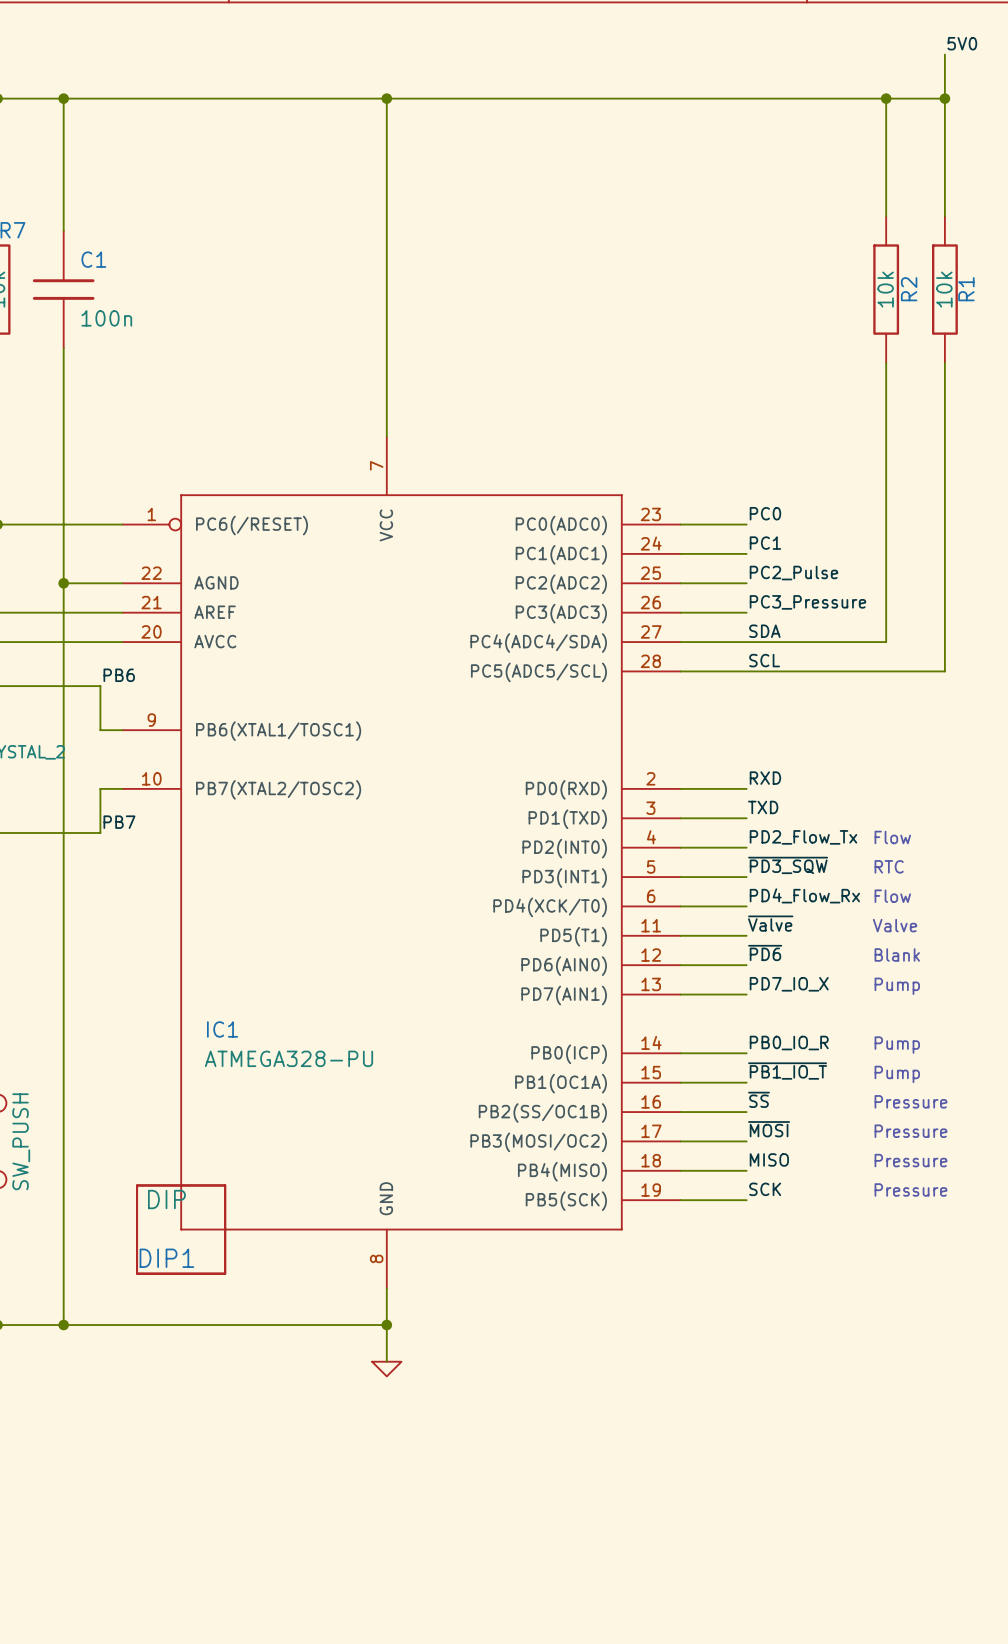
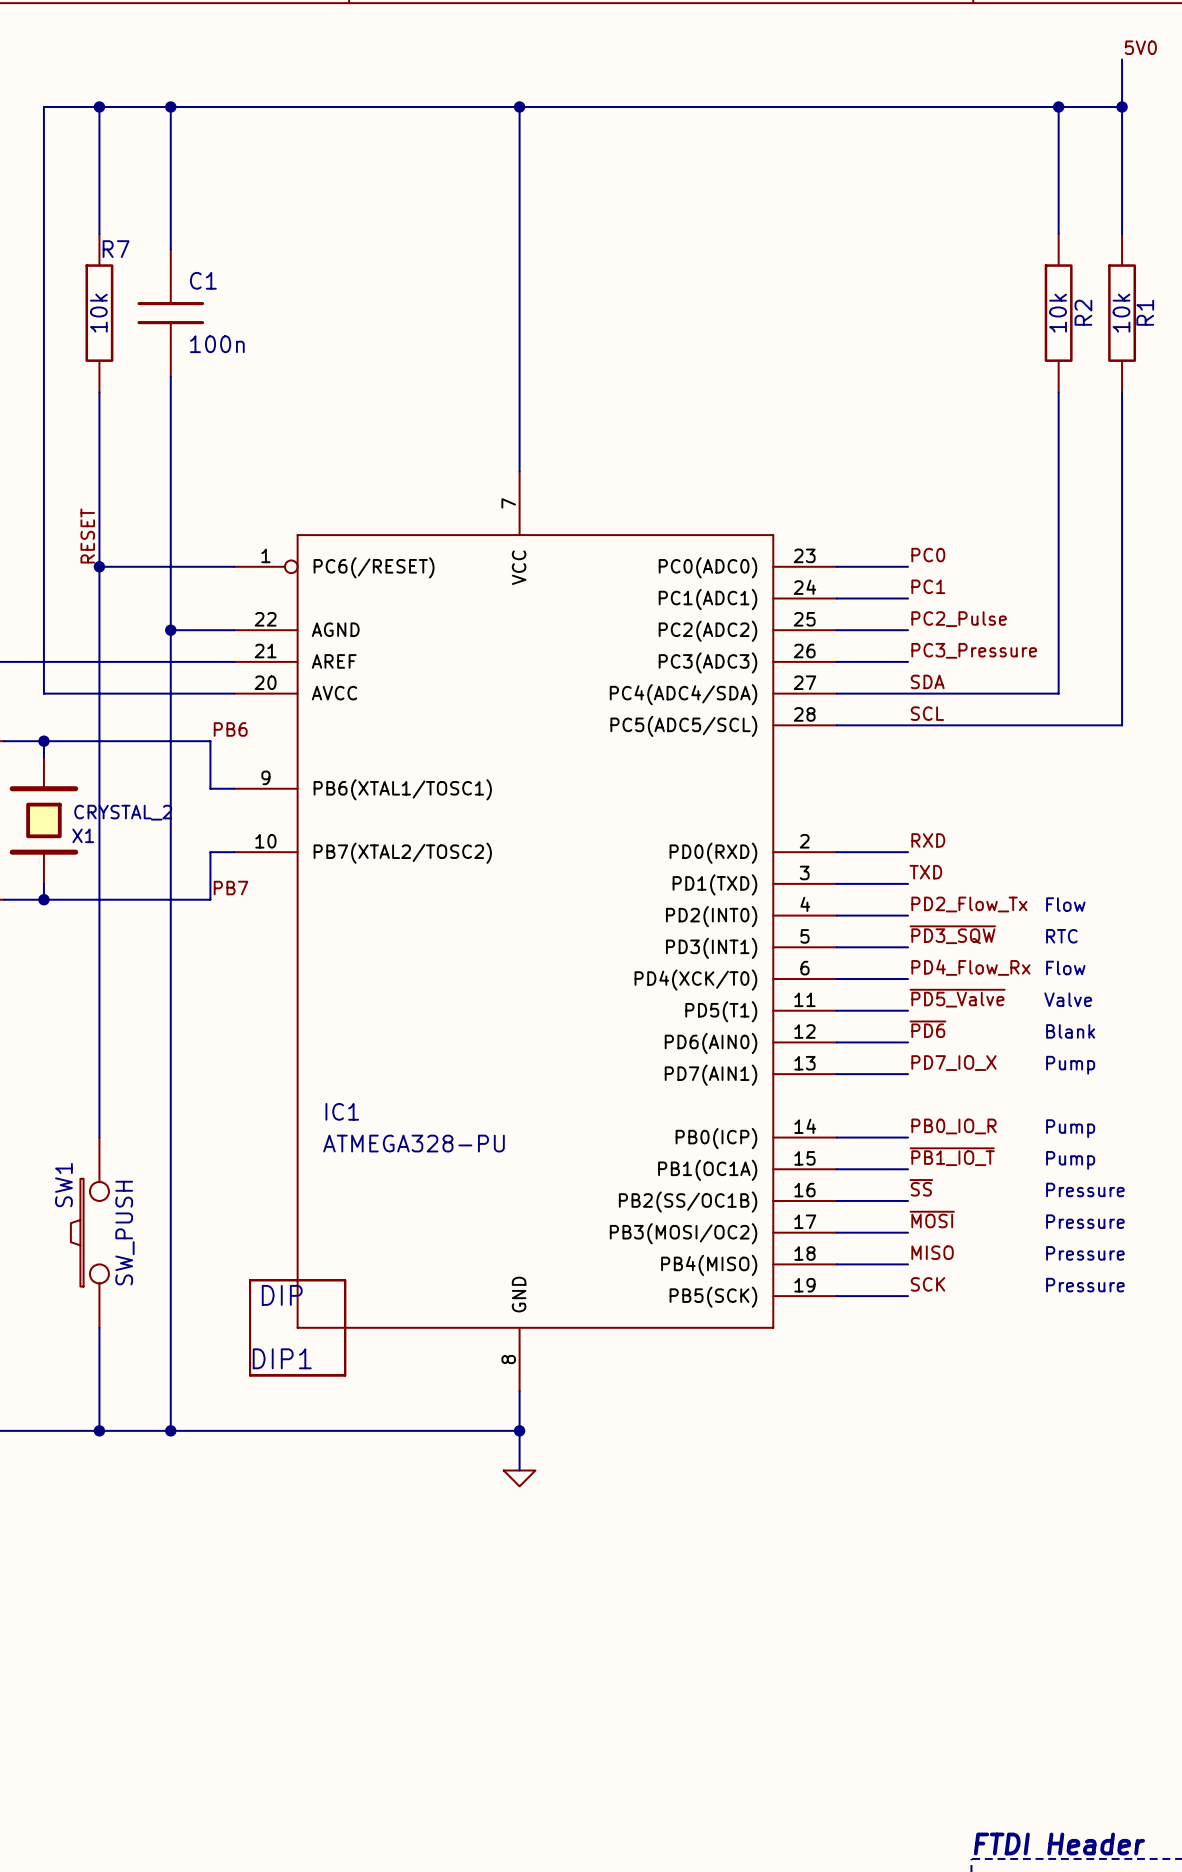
label: ~{Valve} (770, 923) -> ~{PD5_Valve} (957, 998)

